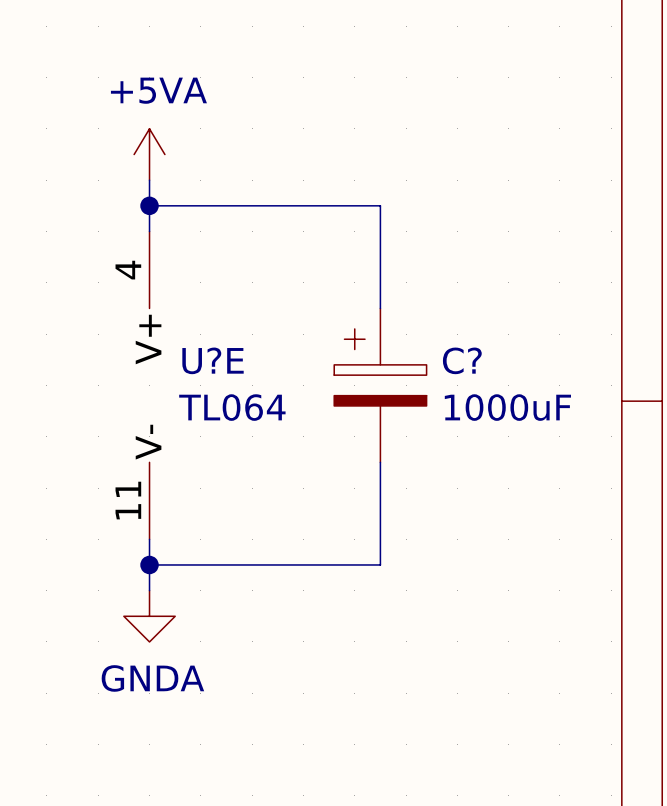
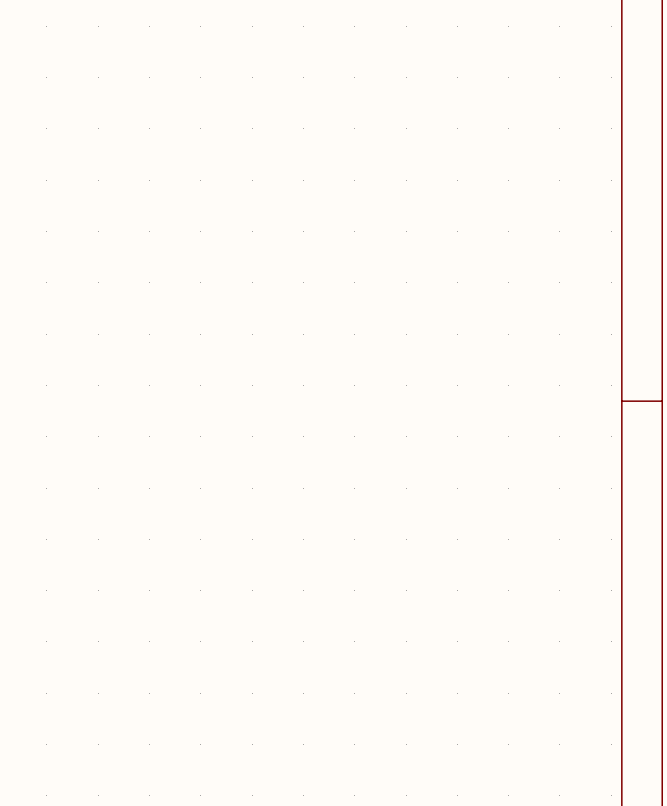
power symbol: +5VA (149, 154) -> none
wire: (149, 180) (149, 231) -> none
wire: (149, 205) (380, 205) (380, 308) -> none
junction: (149, 205) -> none
U?E: TL064 (149, 385) -> none
C?: 1000uF (380, 385) -> none
wire: (380, 462) (380, 564) (149, 564) -> none
wire: (149, 539) (149, 590) -> none
junction: (149, 564) -> none
power symbol: GNDA (149, 616) -> none

